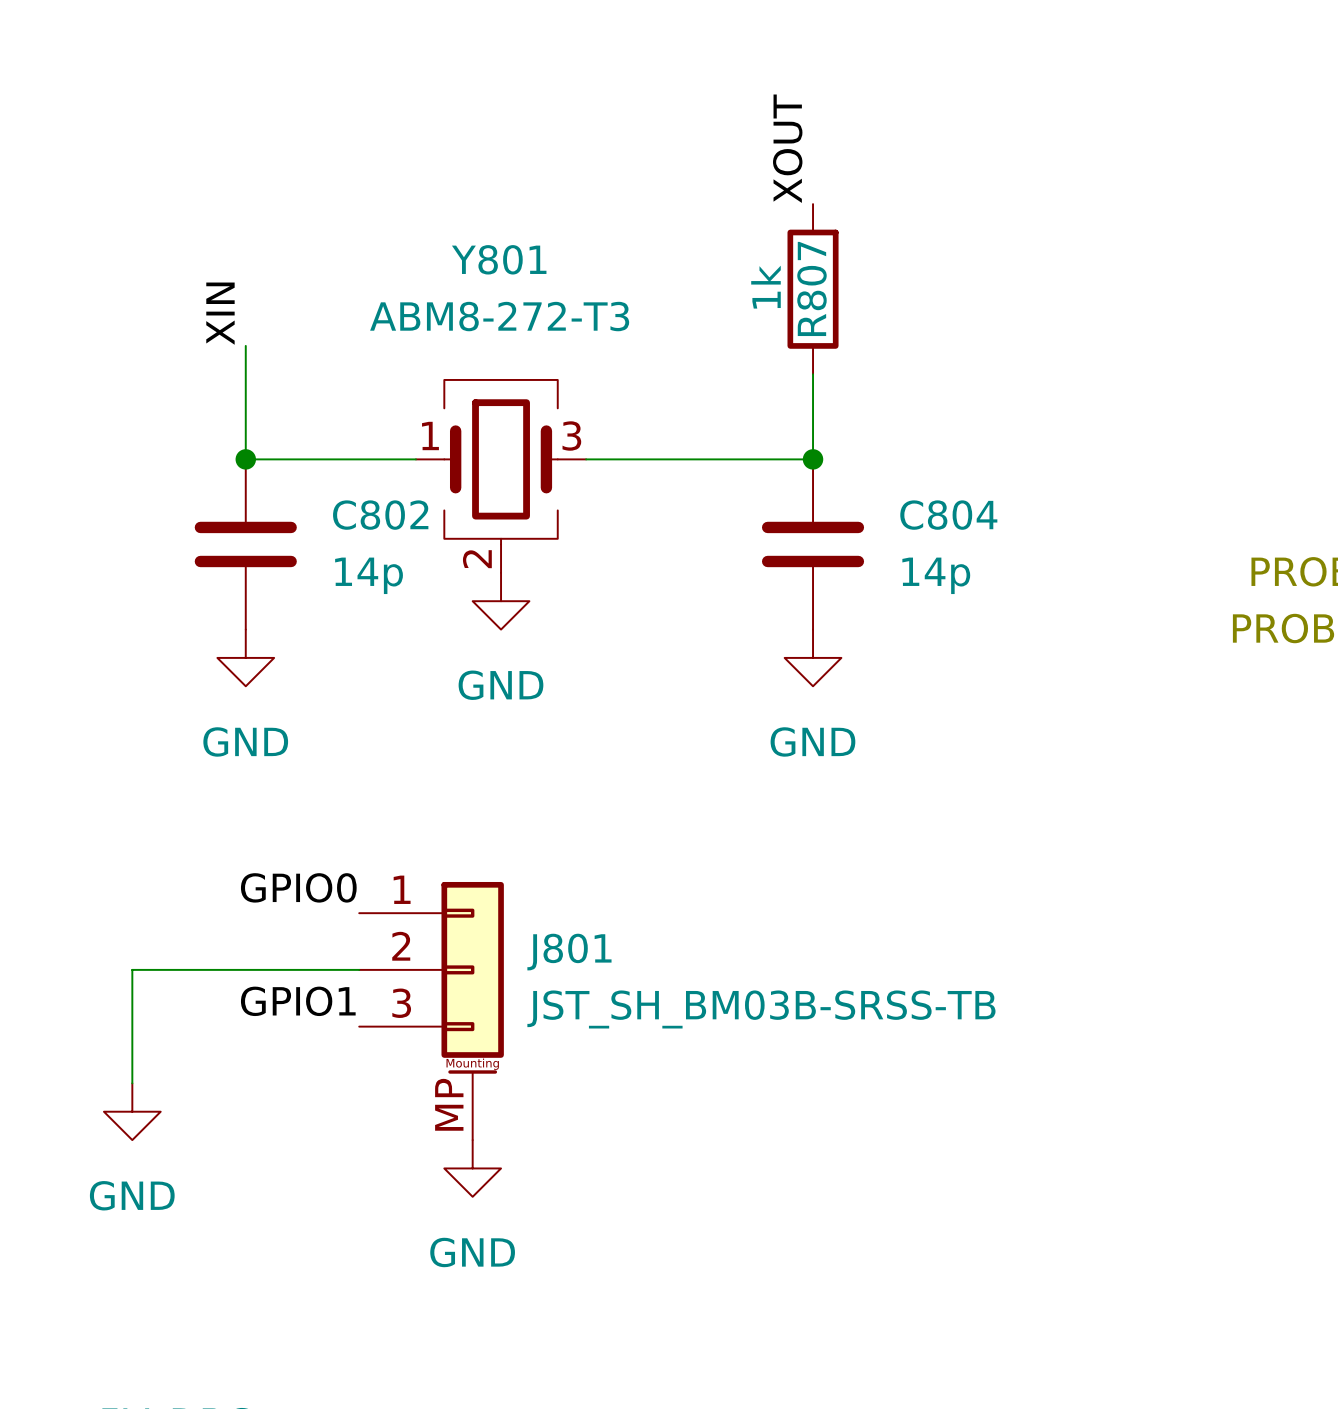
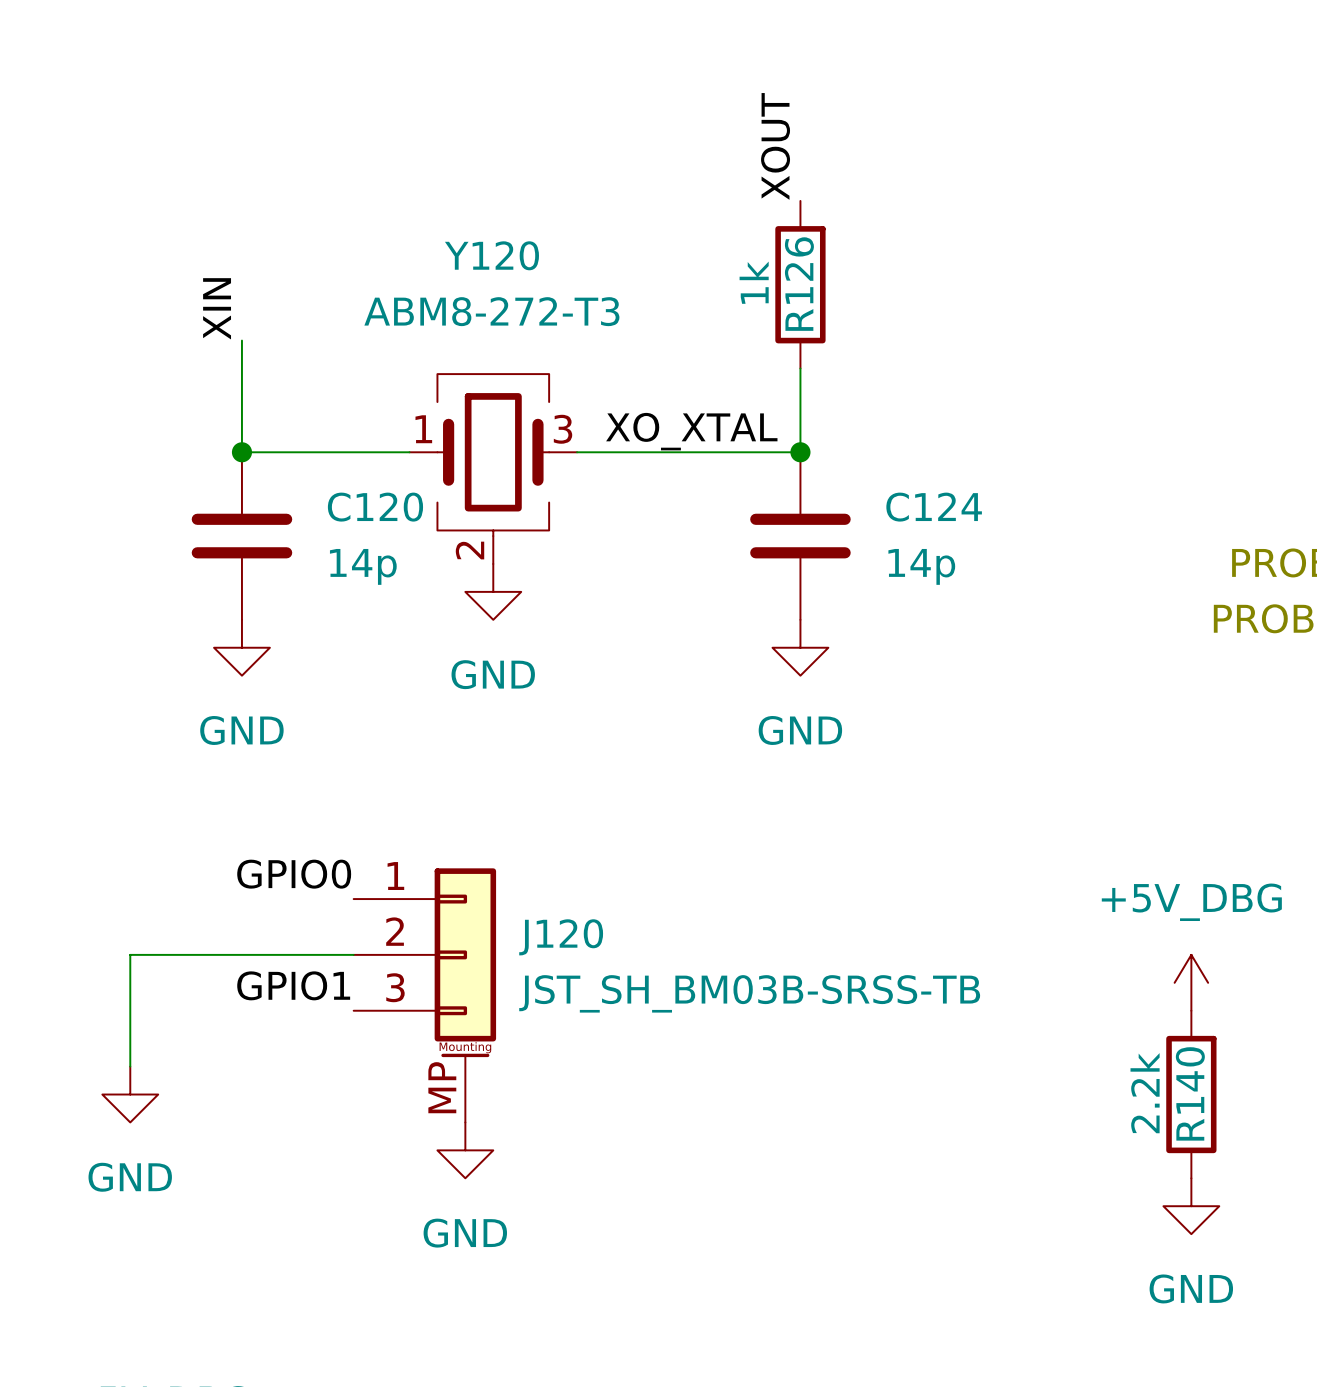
Y801 name: Y801 (499, 259) -> Y120 (491, 255)
R807 name: R807 (811, 288) -> R126 (799, 284)
label: none -> XO_XTAL (691, 431)
C802 name: C802 (380, 515) -> C120 (375, 507)
C804 name: C804 (948, 515) -> C124 (934, 507)
J801 name: J801 (569, 952) -> J120 (561, 937)
power symbol: none -> +5V_DBG (1191, 982)
R140: none -> 2.2k (1191, 1094)
power symbol: none -> GND (1191, 1206)

